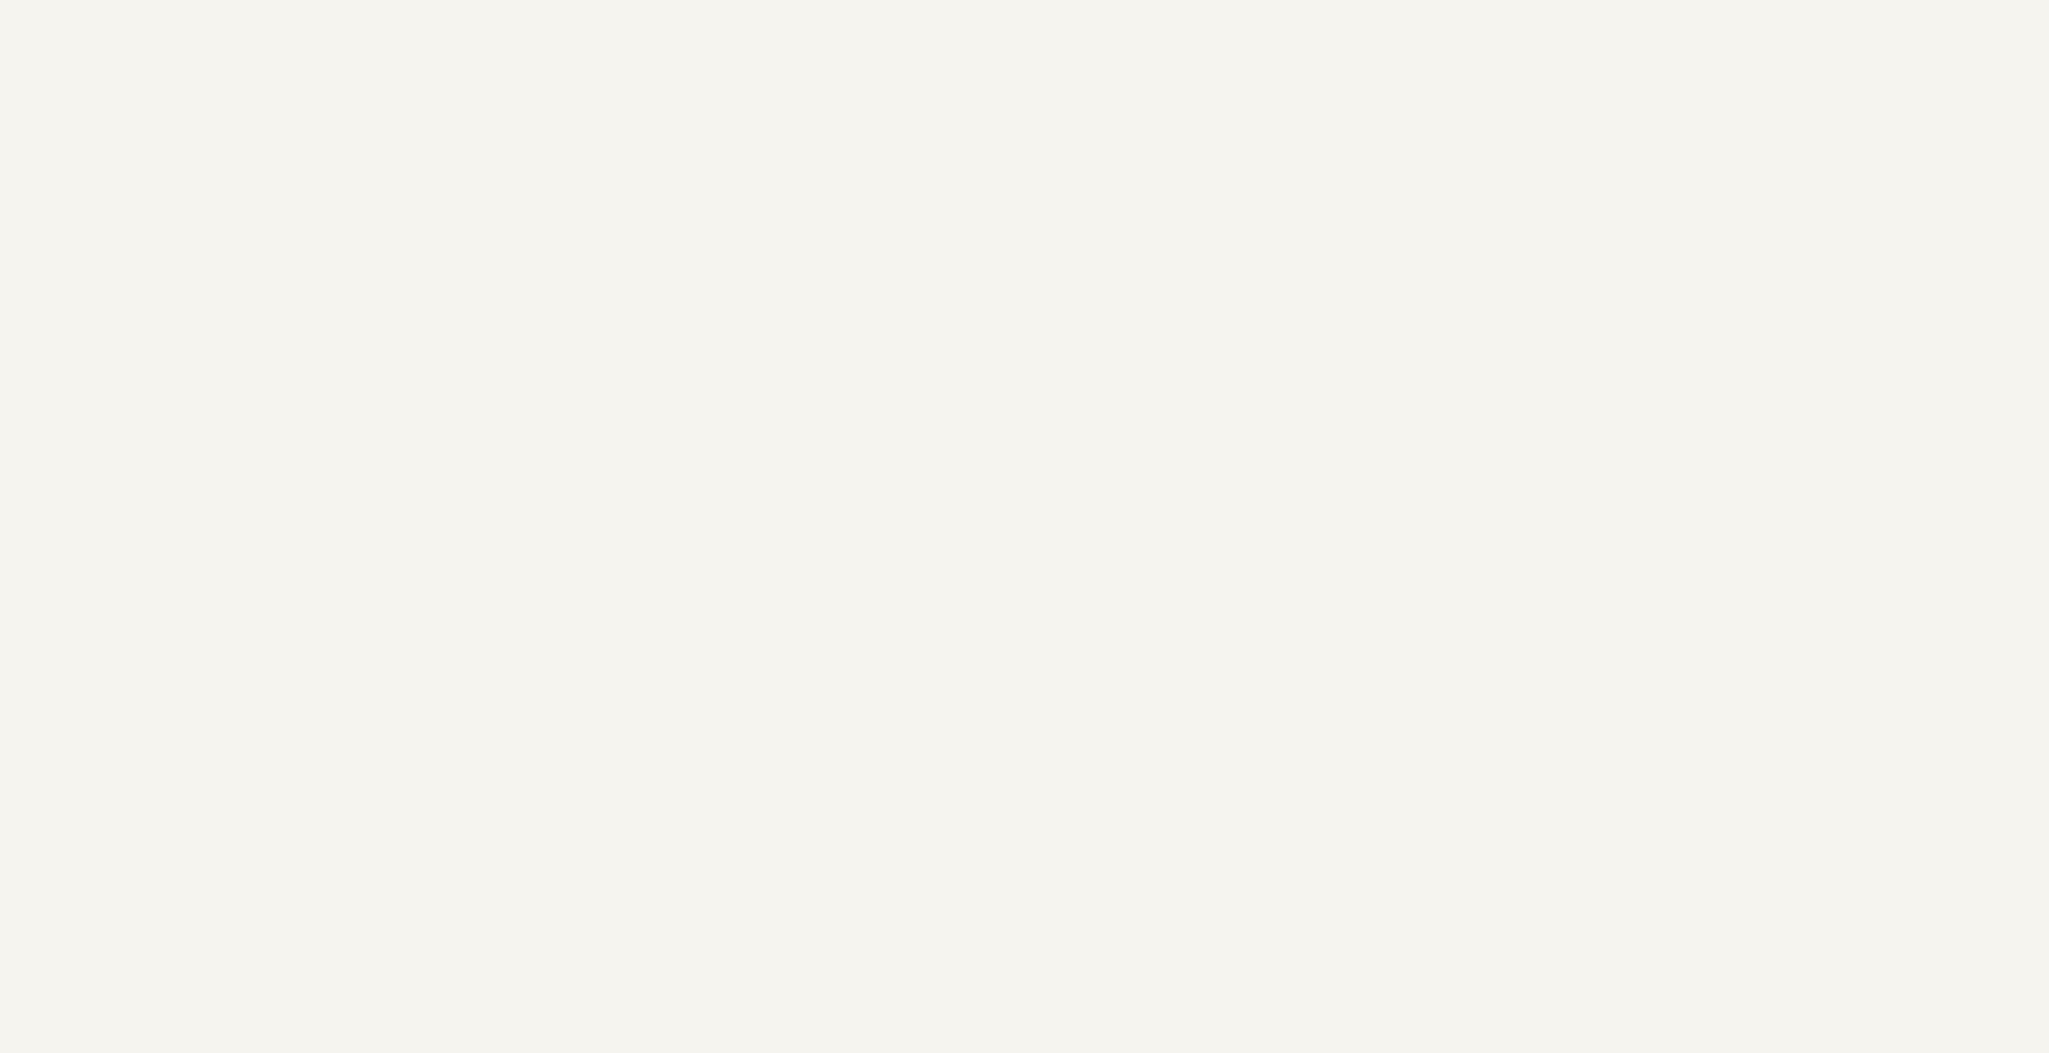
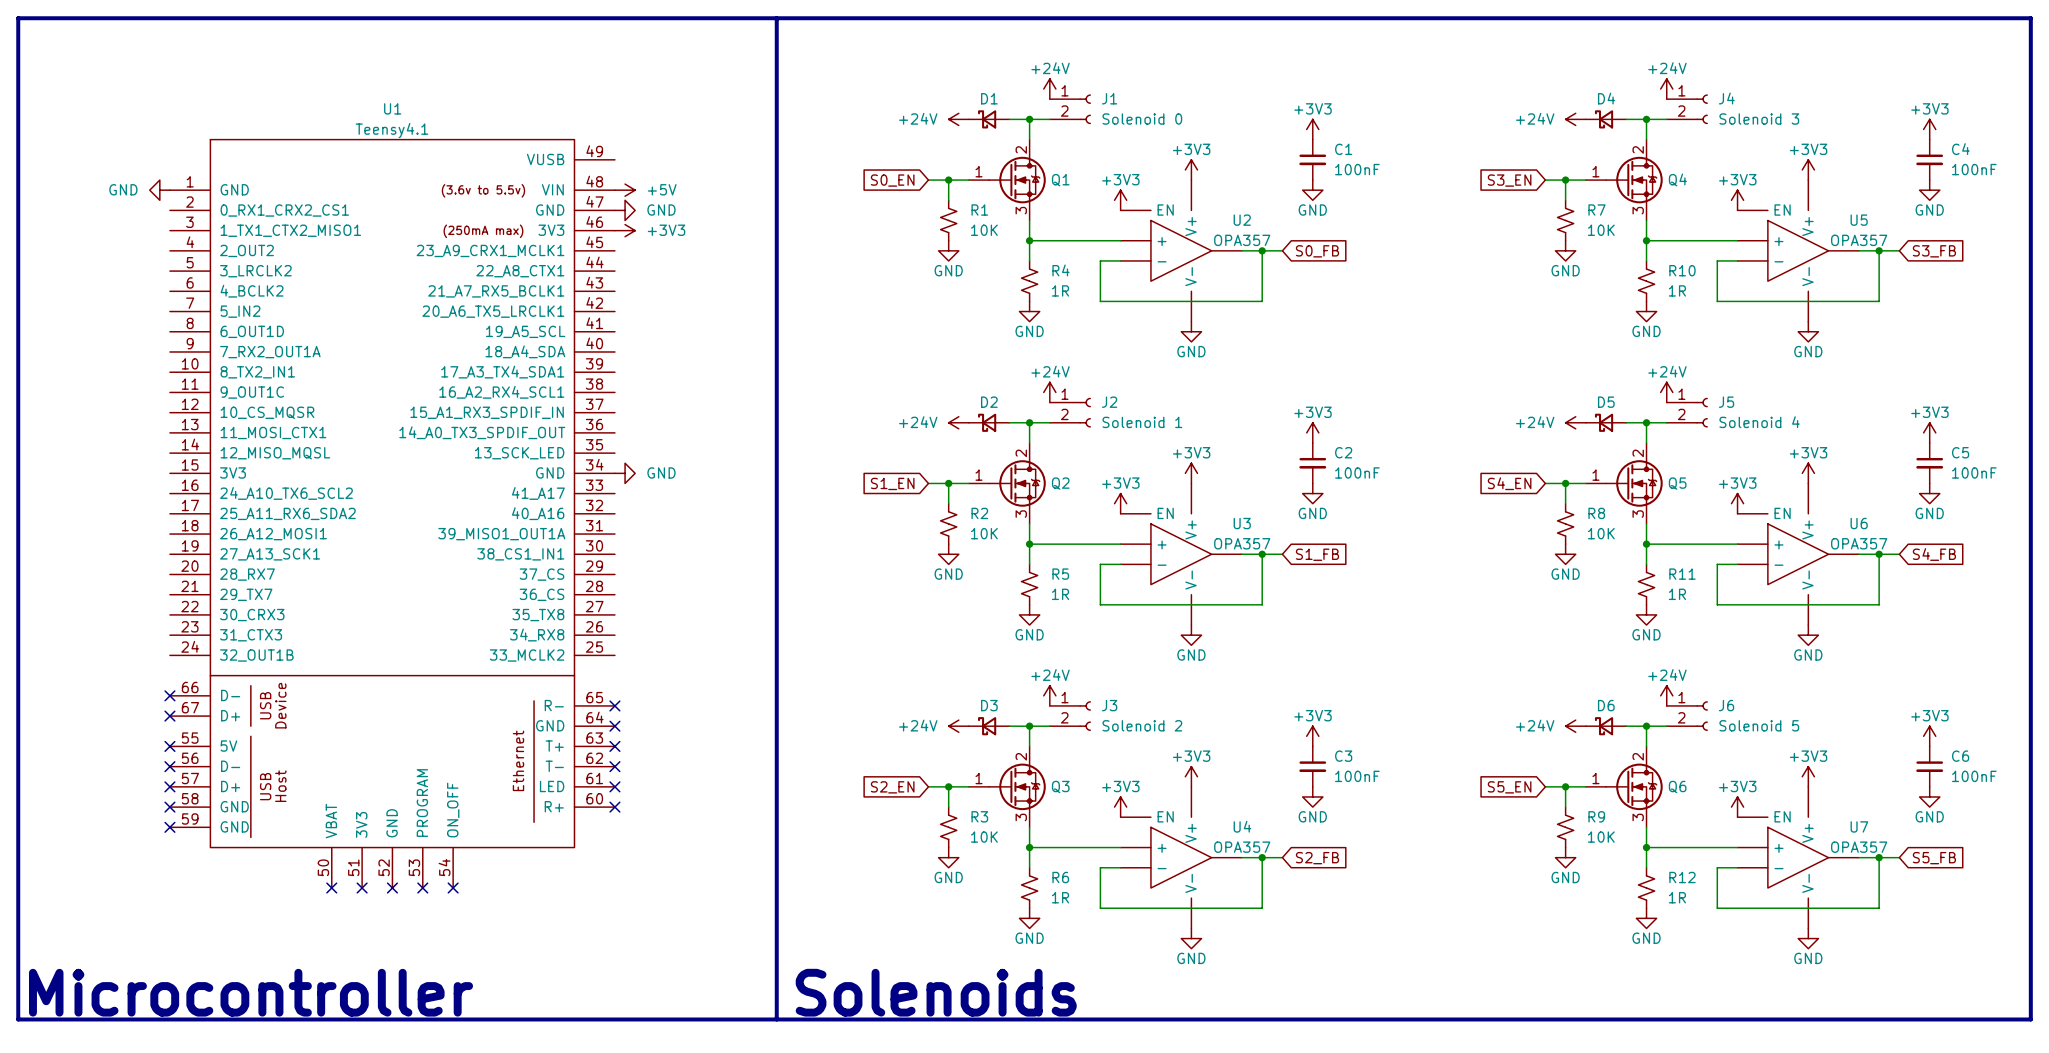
line: none -> (18, 18) (18, 1019) (2030, 1019) (2030, 18) (18, 18)
line: none -> (776, 18) (776, 1019)
power symbol: none -> +24V (1049, 89)
power symbol: none -> +24V (1666, 89)
J1: none -> Solenoid 0 (1070, 109)
J4: none -> Solenoid 3 (1687, 109)
power symbol: none -> +24V (958, 119)
D1: none -> (989, 119)
wire: none -> (1009, 119) (1049, 119)
wire: none -> (1029, 119) (1029, 139)
junction: none -> (1029, 119)
power symbol: none -> +24V (1575, 119)
D4: none -> (1606, 119)
wire: none -> (1626, 119) (1666, 119)
wire: none -> (1646, 119) (1646, 139)
junction: none -> (1646, 119)
power symbol: none -> +3V3 (1312, 129)
power symbol: none -> +3V3 (1929, 129)
C1: none -> 100nF (1312, 159)
C4: none -> 100nF (1929, 159)
power symbol: none -> +3V3 (1191, 169)
power symbol: none -> +3V3 (1808, 169)
global label: none -> S0_EN (892, 180)
wire: none -> (928, 180) (968, 180)
wire: none -> (948, 180) (948, 200)
junction: none -> (948, 180)
Q1: none -> (1007, 180)
global label: none -> S3_EN (1509, 180)
wire: none -> (1545, 180) (1585, 180)
wire: none -> (1565, 180) (1565, 200)
junction: none -> (1565, 180)
Q4: none -> (1624, 180)
power symbol: none -> GND (159, 190)
power symbol: none -> +5V (625, 190)
power symbol: none -> GND (1312, 190)
power symbol: none -> GND (1929, 190)
power symbol: none -> +3V3 (1120, 200)
power symbol: none -> +3V3 (1737, 200)
power symbol: none -> GND (625, 210)
R1: none -> 10K (948, 220)
wire: none -> (1029, 220) (1029, 260)
R7: none -> 10K (1565, 220)
wire: none -> (1646, 220) (1646, 260)
power symbol: none -> +3V3 (625, 230)
wire: none -> (1029, 240) (1120, 240)
junction: none -> (1029, 240)
wire: none -> (1646, 240) (1737, 240)
junction: none -> (1646, 240)
power symbol: none -> GND (948, 250)
U2: none -> OPA357 (1181, 250)
wire: none -> (1241, 250) (1282, 250)
wire: none -> (1262, 250) (1262, 301) (1100, 301) (1100, 260) (1120, 260)
junction: none -> (1262, 250)
power symbol: none -> GND (1565, 250)
U5: none -> OPA357 (1798, 250)
wire: none -> (1858, 250) (1899, 250)
wire: none -> (1879, 250) (1879, 301) (1717, 301) (1717, 260) (1737, 260)
junction: none -> (1879, 250)
global label: none -> S0_FB (1317, 251)
global label: none -> S3_FB (1934, 251)
R4: none -> 1R (1029, 281)
R10: none -> 1R (1646, 281)
power symbol: none -> GND (1029, 311)
power symbol: none -> GND (1646, 311)
power symbol: none -> GND (1191, 331)
power symbol: none -> GND (1808, 331)
power symbol: none -> +24V (1049, 392)
power symbol: none -> +24V (1666, 392)
J2: none -> Solenoid 1 (1070, 412)
J5: none -> Solenoid 4 (1687, 412)
power symbol: none -> +24V (958, 422)
D2: none -> (989, 422)
wire: none -> (1009, 422) (1049, 422)
wire: none -> (1029, 422) (1029, 443)
junction: none -> (1029, 422)
power symbol: none -> +24V (1575, 422)
D5: none -> (1606, 422)
wire: none -> (1626, 422) (1666, 422)
wire: none -> (1646, 422) (1646, 443)
junction: none -> (1646, 422)
power symbol: none -> +3V3 (1312, 432)
power symbol: none -> +3V3 (1929, 432)
C2: none -> 100nF (1312, 463)
C5: none -> 100nF (1929, 463)
power symbol: none -> GND (625, 473)
power symbol: none -> +3V3 (1191, 473)
power symbol: none -> +3V3 (1808, 473)
global label: none -> S1_EN (892, 483)
wire: none -> (928, 483) (968, 483)
wire: none -> (948, 483) (948, 503)
junction: none -> (948, 483)
Q2: none -> (1007, 483)
global label: none -> S4_EN (1509, 483)
wire: none -> (1545, 483) (1585, 483)
wire: none -> (1565, 483) (1565, 503)
junction: none -> (1565, 483)
Q5: none -> (1624, 483)
power symbol: none -> GND (1312, 493)
power symbol: none -> GND (1929, 493)
power symbol: none -> +3V3 (1120, 503)
power symbol: none -> +3V3 (1737, 503)
U1: none -> Teensy4.1 (392, 513)
R2: none -> 10K (948, 523)
wire: none -> (1029, 523) (1029, 564)
R8: none -> 10K (1565, 523)
wire: none -> (1646, 523) (1646, 564)
wire: none -> (1029, 544) (1120, 544)
junction: none -> (1029, 544)
wire: none -> (1646, 544) (1737, 544)
junction: none -> (1646, 544)
power symbol: none -> GND (948, 554)
U3: none -> OPA357 (1181, 554)
wire: none -> (1241, 554) (1282, 554)
wire: none -> (1262, 554) (1262, 604) (1100, 604) (1100, 564) (1120, 564)
junction: none -> (1262, 554)
global label: none -> S1_FB (1317, 554)
power symbol: none -> GND (1565, 554)
U6: none -> OPA357 (1798, 554)
wire: none -> (1858, 554) (1899, 554)
wire: none -> (1879, 554) (1879, 604) (1717, 604) (1717, 564) (1737, 564)
junction: none -> (1879, 554)
global label: none -> S4_FB (1934, 554)
R5: none -> 1R (1029, 584)
R11: none -> 1R (1646, 584)
power symbol: none -> GND (1029, 614)
power symbol: none -> GND (1646, 614)
power symbol: none -> GND (1191, 635)
power symbol: none -> GND (1808, 635)
no-connect mark: none -> (169, 695)
power symbol: none -> +24V (1049, 695)
power symbol: none -> +24V (1666, 695)
no-connect mark: none -> (614, 705)
no-connect mark: none -> (169, 716)
J3: none -> Solenoid 2 (1070, 716)
J6: none -> Solenoid 5 (1687, 716)
no-connect mark: none -> (614, 726)
power symbol: none -> +24V (958, 726)
D3: none -> (989, 726)
wire: none -> (1009, 726) (1049, 726)
wire: none -> (1029, 726) (1029, 746)
junction: none -> (1029, 726)
power symbol: none -> +24V (1575, 726)
D6: none -> (1606, 726)
wire: none -> (1626, 726) (1666, 726)
wire: none -> (1646, 726) (1646, 746)
junction: none -> (1646, 726)
power symbol: none -> +3V3 (1312, 736)
power symbol: none -> +3V3 (1929, 736)
no-connect mark: none -> (169, 746)
no-connect mark: none -> (614, 746)
no-connect mark: none -> (169, 766)
no-connect mark: none -> (614, 766)
C3: none -> 100nF (1312, 766)
C6: none -> 100nF (1929, 766)
power symbol: none -> +3V3 (1191, 776)
power symbol: none -> +3V3 (1808, 776)
no-connect mark: none -> (169, 786)
no-connect mark: none -> (614, 786)
wire: none -> (928, 786) (968, 786)
wire: none -> (948, 786) (948, 807)
junction: none -> (948, 786)
Q3: none -> (1007, 786)
wire: none -> (1545, 786) (1585, 786)
wire: none -> (1565, 786) (1565, 807)
junction: none -> (1565, 786)
Q6: none -> (1624, 786)
global label: none -> S2_EN (892, 787)
global label: none -> S5_EN (1509, 787)
power symbol: none -> GND (1312, 796)
power symbol: none -> GND (1929, 796)
no-connect mark: none -> (169, 807)
no-connect mark: none -> (614, 807)
power symbol: none -> +3V3 (1120, 807)
power symbol: none -> +3V3 (1737, 807)
no-connect mark: none -> (169, 827)
R3: none -> 10K (948, 827)
wire: none -> (1029, 827) (1029, 867)
R9: none -> 10K (1565, 827)
wire: none -> (1646, 827) (1646, 867)
wire: none -> (1029, 847) (1120, 847)
junction: none -> (1029, 847)
wire: none -> (1646, 847) (1737, 847)
junction: none -> (1646, 847)
power symbol: none -> GND (948, 857)
U4: none -> OPA357 (1181, 857)
wire: none -> (1241, 857) (1282, 857)
wire: none -> (1262, 857) (1262, 908) (1100, 908) (1100, 867) (1120, 867)
junction: none -> (1262, 857)
power symbol: none -> GND (1565, 857)
U7: none -> OPA357 (1798, 857)
wire: none -> (1858, 857) (1899, 857)
wire: none -> (1879, 857) (1879, 908) (1717, 908) (1717, 867) (1737, 867)
junction: none -> (1879, 857)
global label: none -> S2_FB (1317, 858)
global label: none -> S5_FB (1934, 858)
no-connect mark: none -> (331, 888)
no-connect mark: none -> (362, 888)
no-connect mark: none -> (392, 888)
no-connect mark: none -> (422, 888)
no-connect mark: none -> (453, 888)
R6: none -> 1R (1029, 888)
R12: none -> 1R (1646, 888)
power symbol: none -> GND (1029, 918)
power symbol: none -> GND (1646, 918)
power symbol: none -> GND (1191, 938)
power symbol: none -> GND (1808, 938)
text: none -> Microcontroller (251, 992)
text: none -> Solenoids (936, 992)

